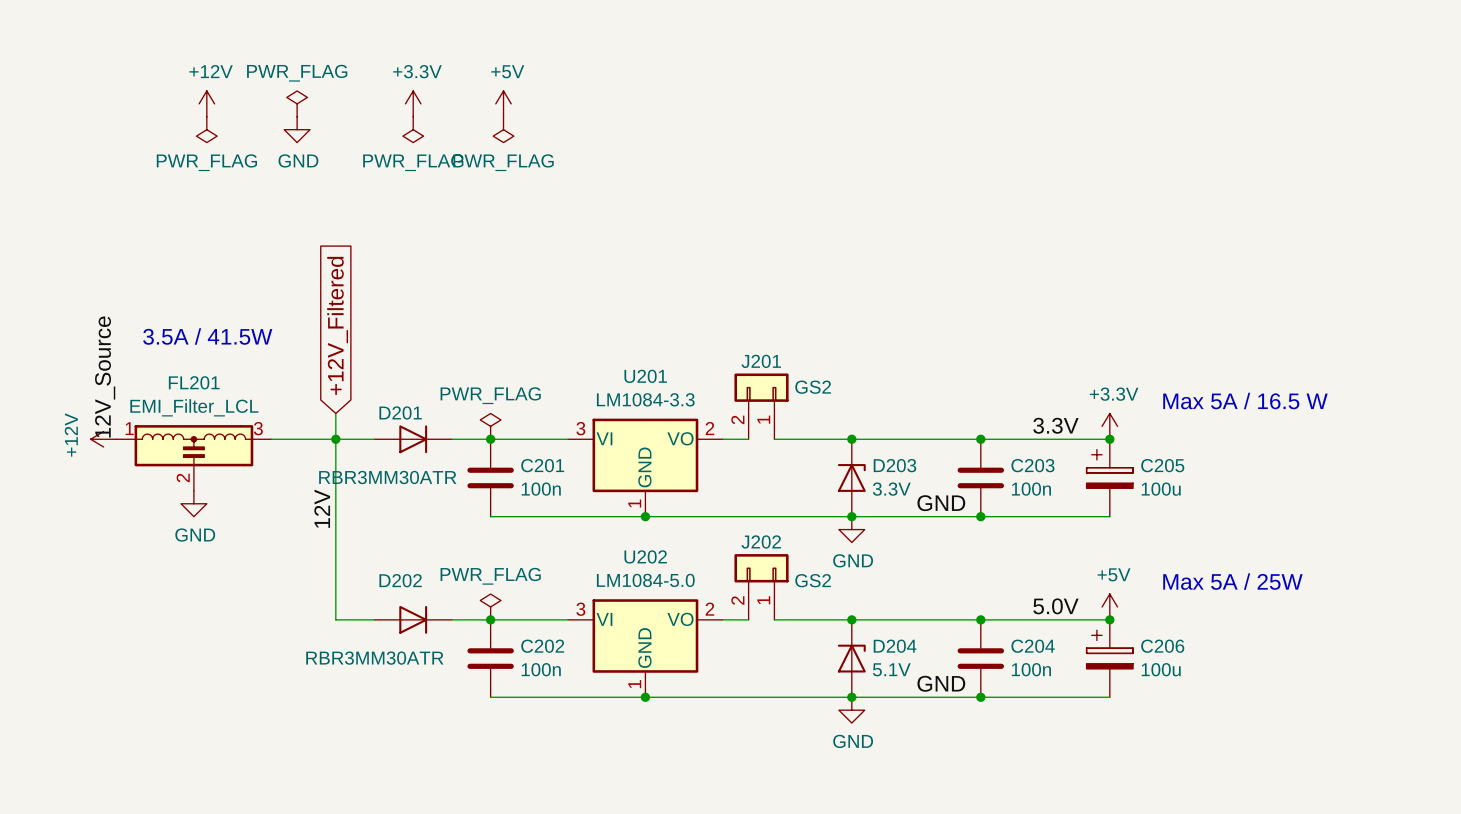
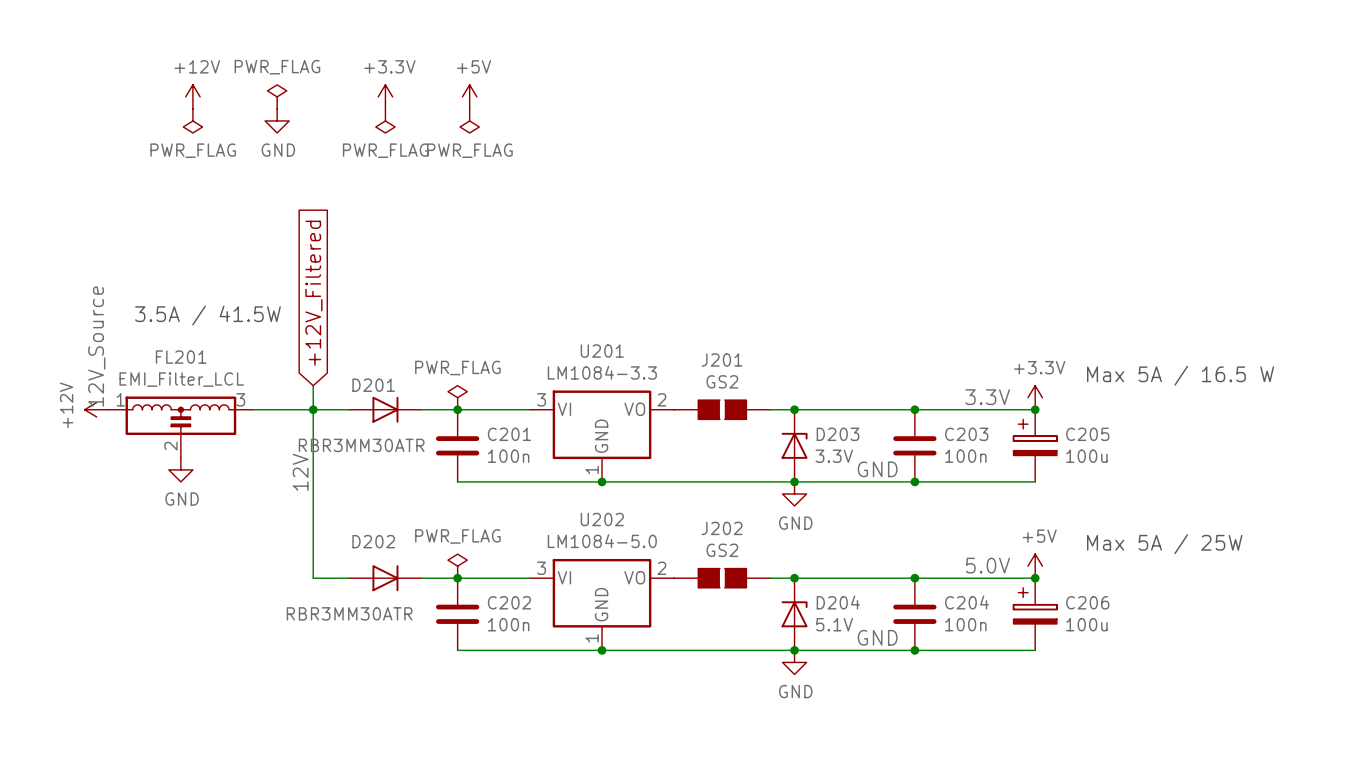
J201 symbol: [734, 373, 789, 440] -> [674, 400, 771, 420]
J201 value position: GS2 (813, 387) -> GS2 (722, 381)
J202 symbol: [734, 554, 789, 620] -> [674, 568, 771, 588]
J202 value position: GS2 (813, 580) -> GS2 (722, 550)

